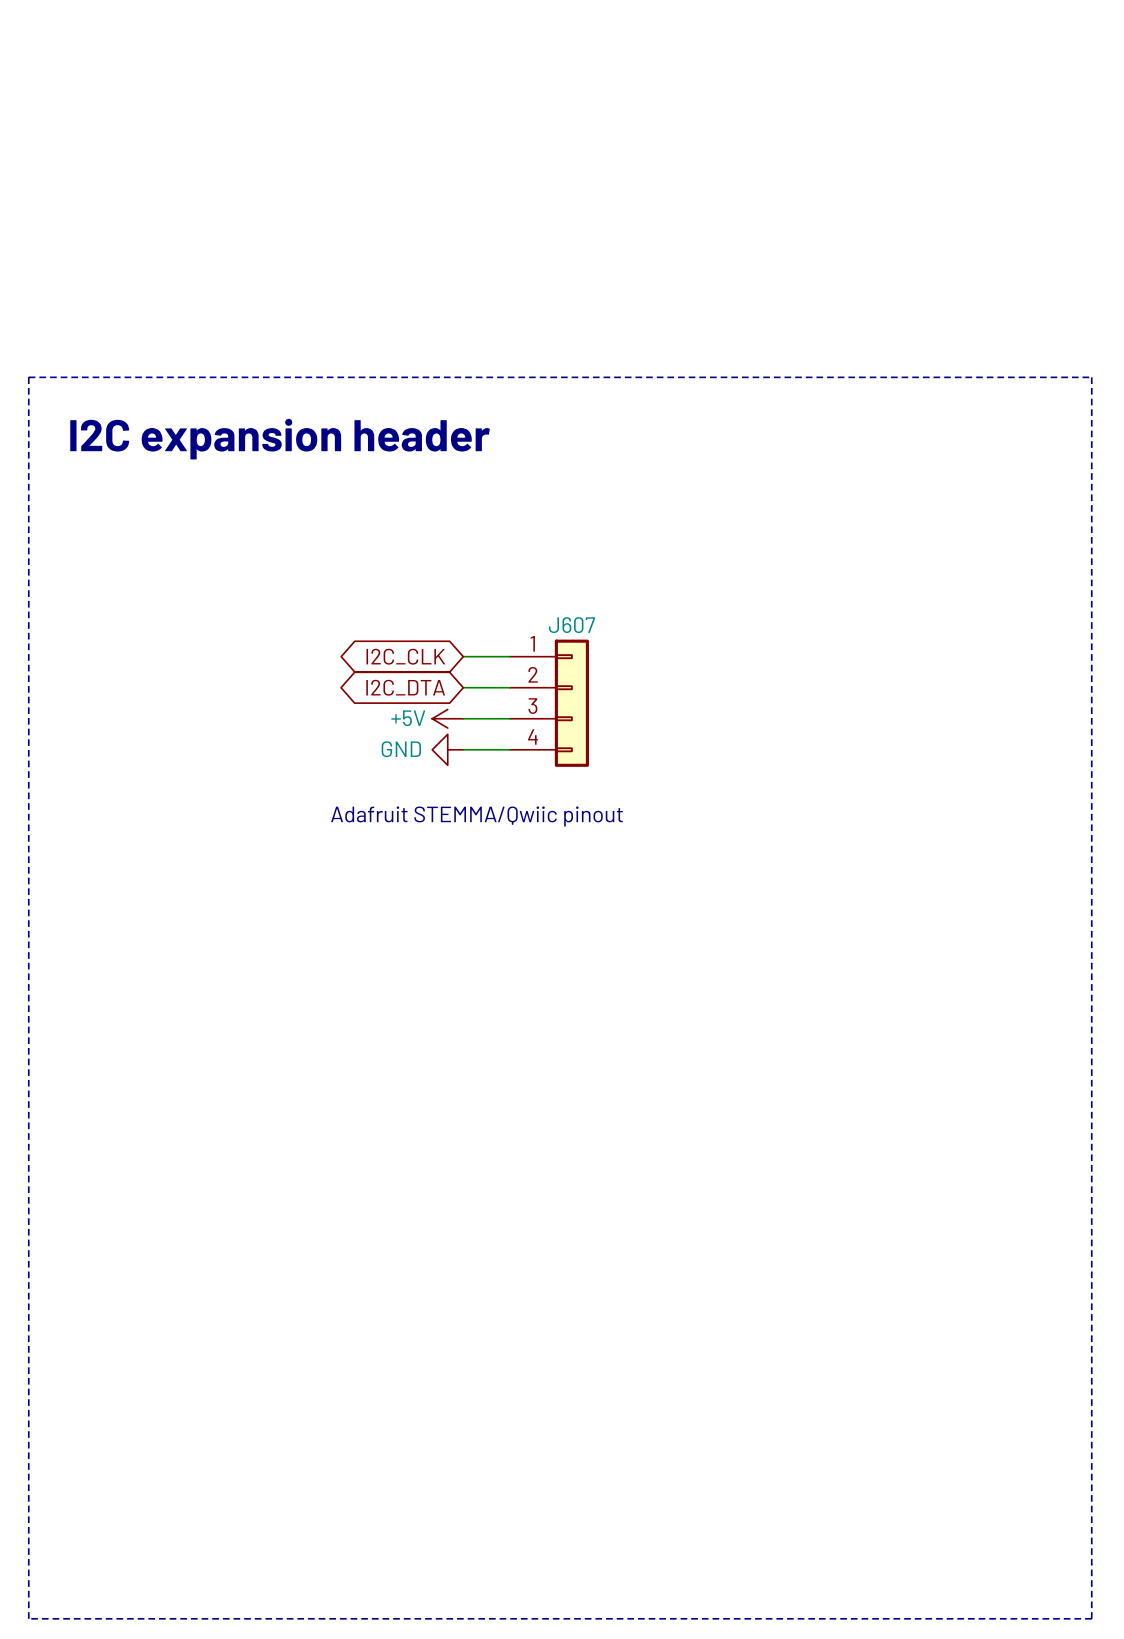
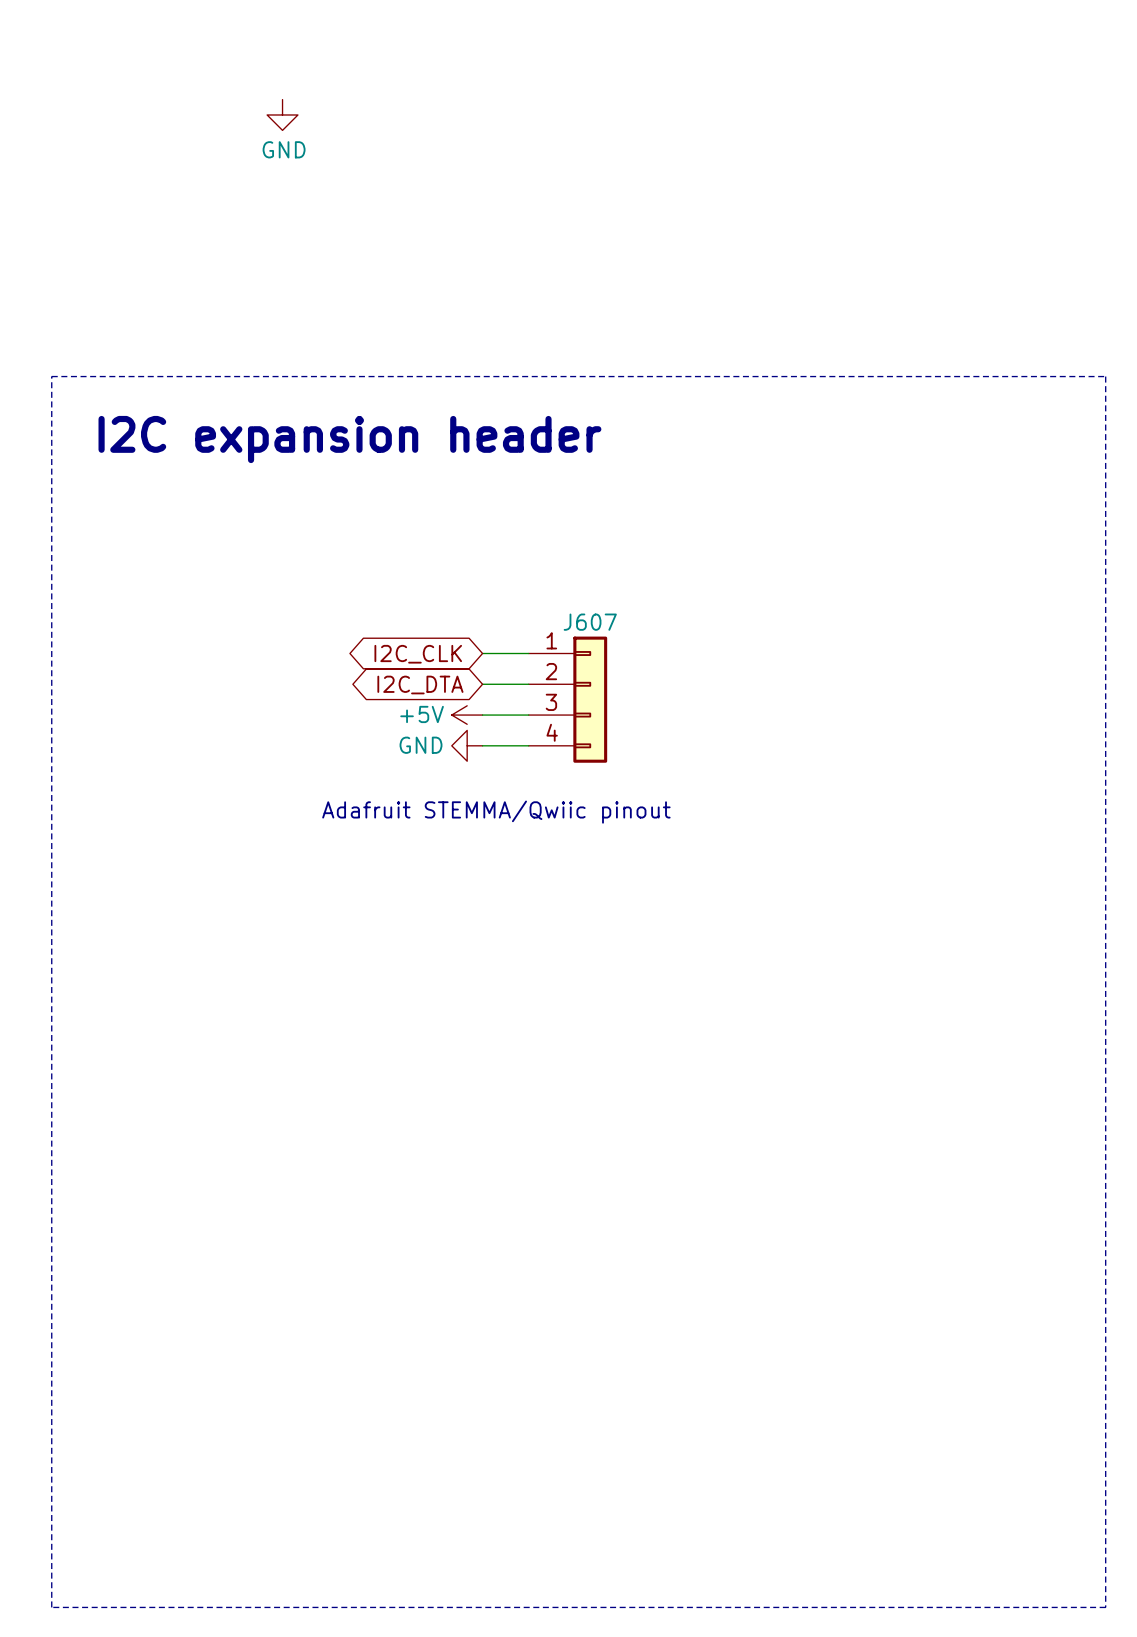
power symbol: none -> GND (282, 114)

